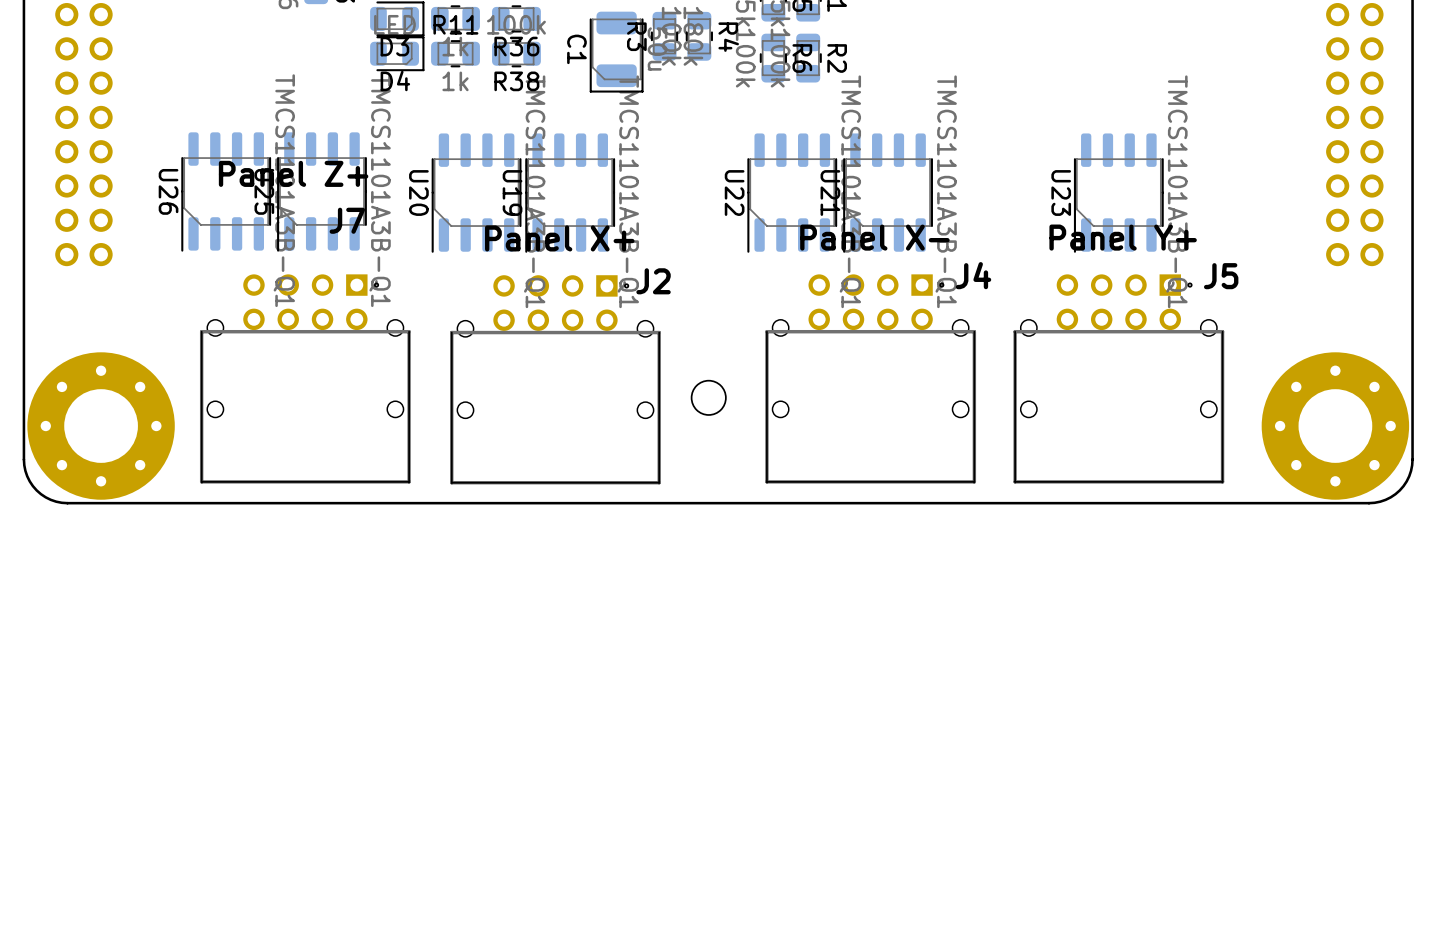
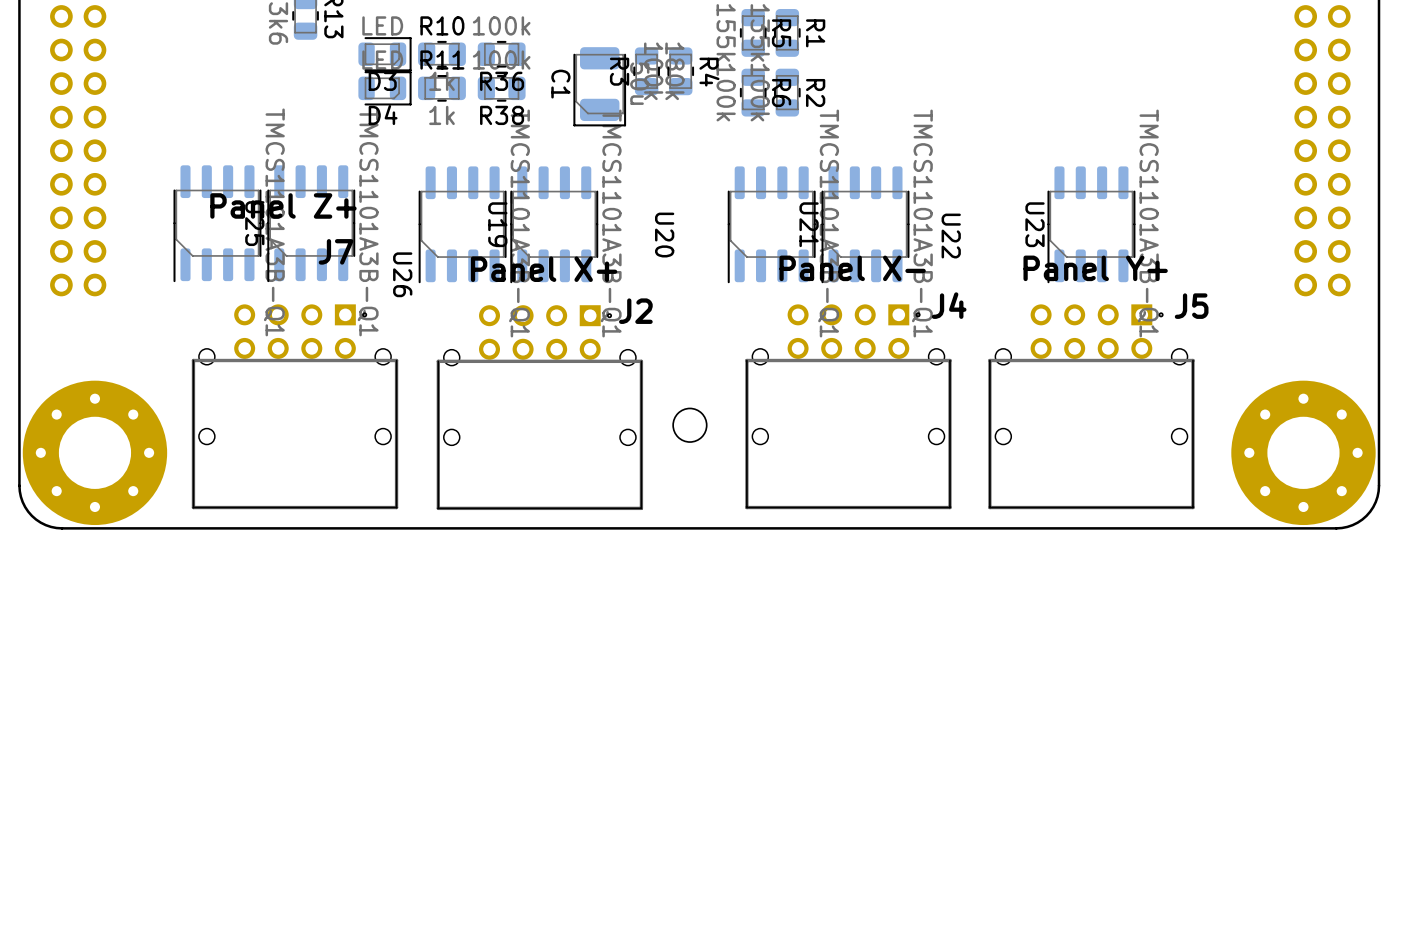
U26 name position: U26 (168, 191) -> U26 (402, 274)
U20 name position: U20 (418, 193) -> U20 (664, 235)
U22 name position: U22 (734, 193) -> U22 (951, 236)

